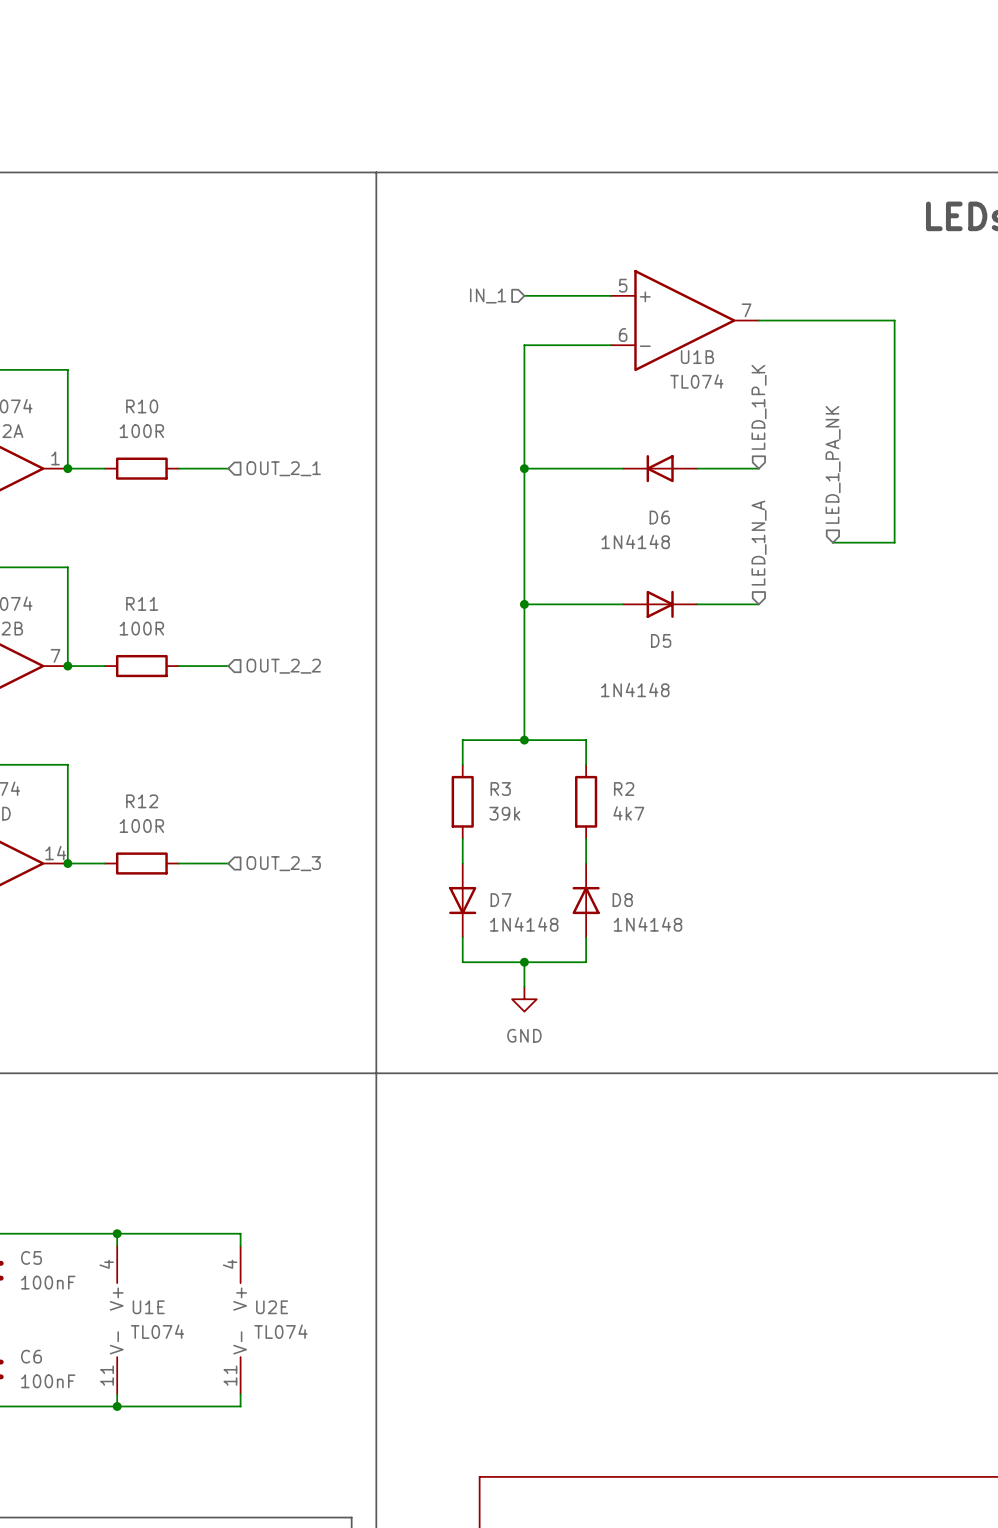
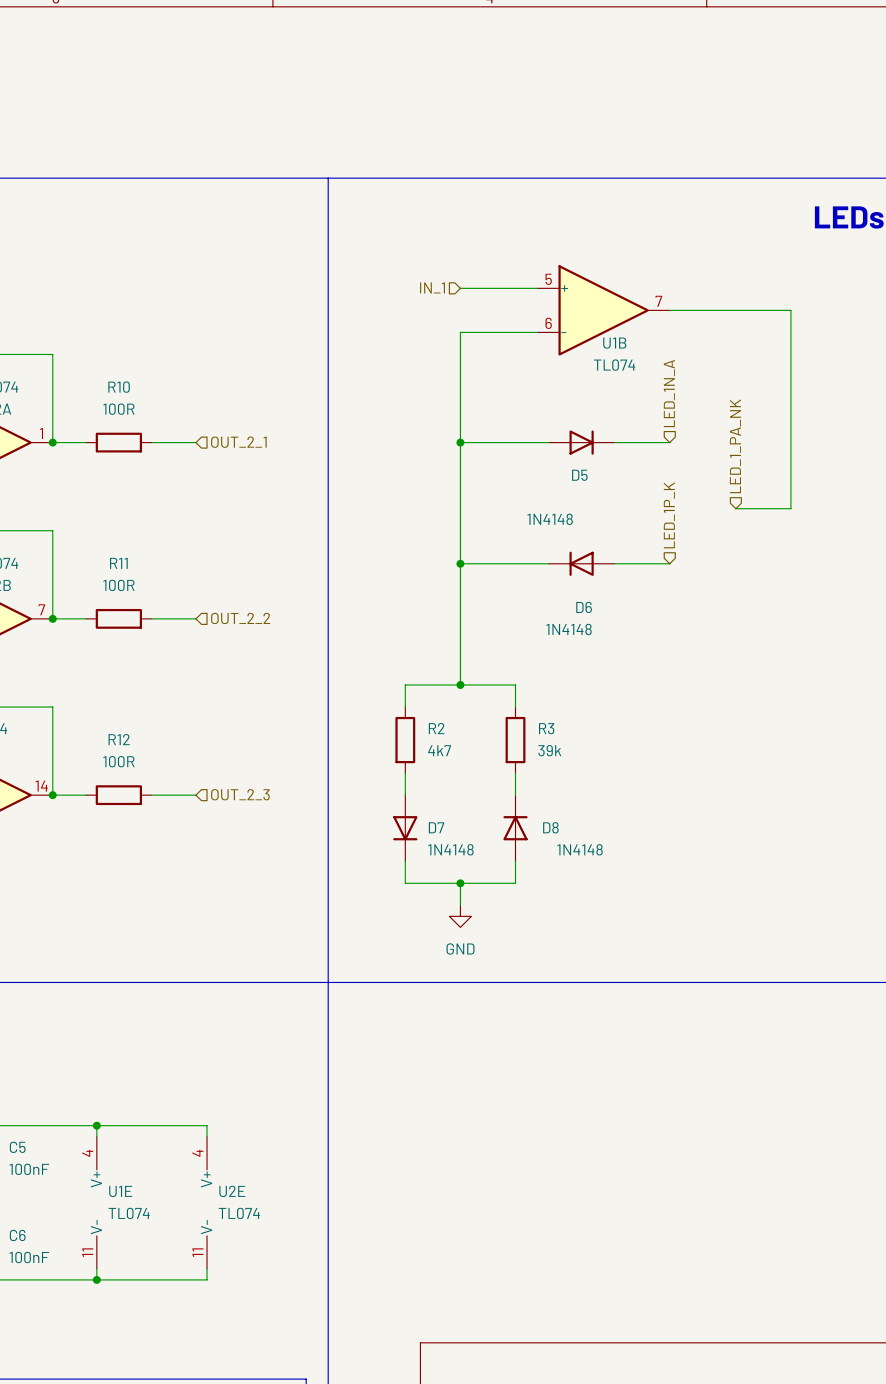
hierarchical label: LED_1P_K (759, 407) -> LED_1N_A (669, 393)
D6 position: (660, 468) -> (581, 563)
hierarchical label: LED_1N_A (759, 543) -> LED_1P_K (669, 515)
D5 position: (660, 604) -> (581, 442)
R3 name: R3 (500, 789) -> R2 (436, 728)
R2 name: R2 (624, 789) -> R3 (546, 728)
R3 value: 39k (504, 813) -> 4k7 (439, 750)
R2 value: 4k7 (628, 813) -> 39k (549, 750)

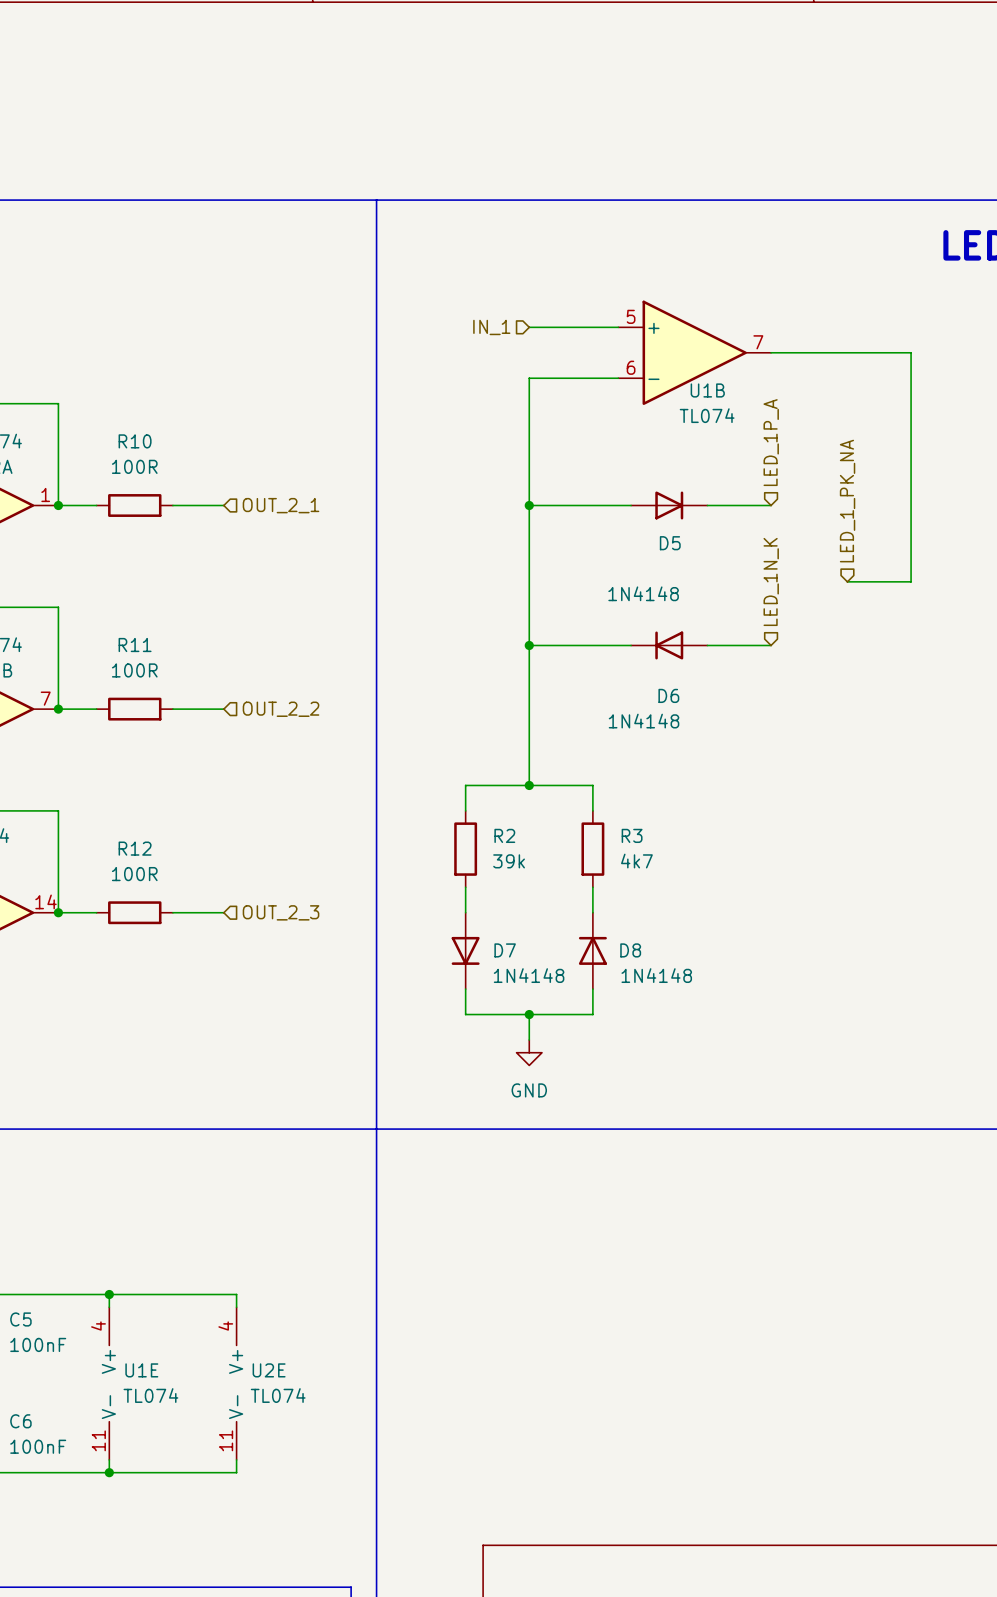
hierarchical label: LED_1N_A (669, 393) -> LED_1P_A (771, 442)
hierarchical label: LED_1_PA_NK (735, 446) -> LED_1_PK_NA (847, 501)
hierarchical label: LED_1P_K (669, 515) -> LED_1N_K (771, 581)
R2 value: 4k7 (439, 750) -> 39k (509, 861)
R3 value: 39k (549, 750) -> 4k7 (636, 861)

